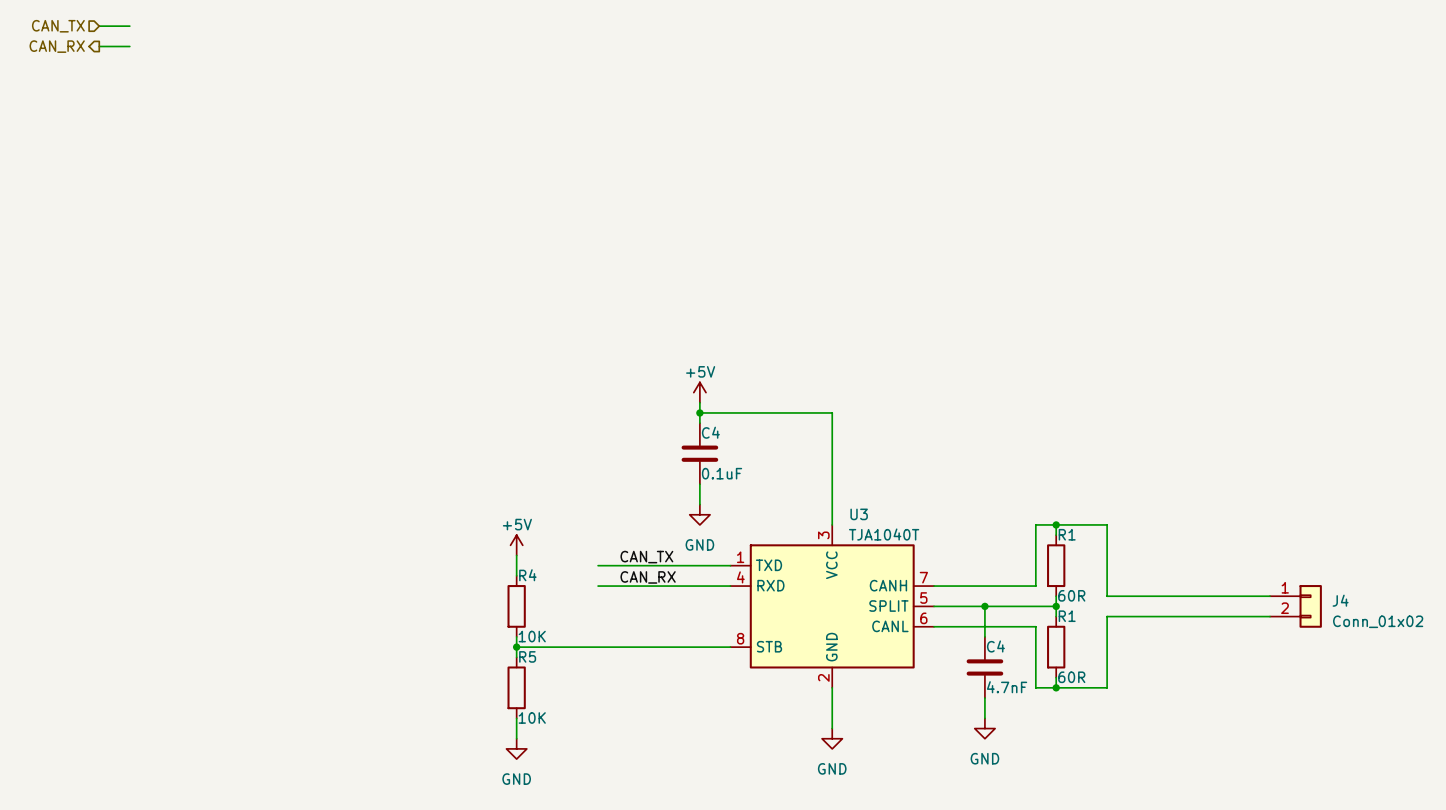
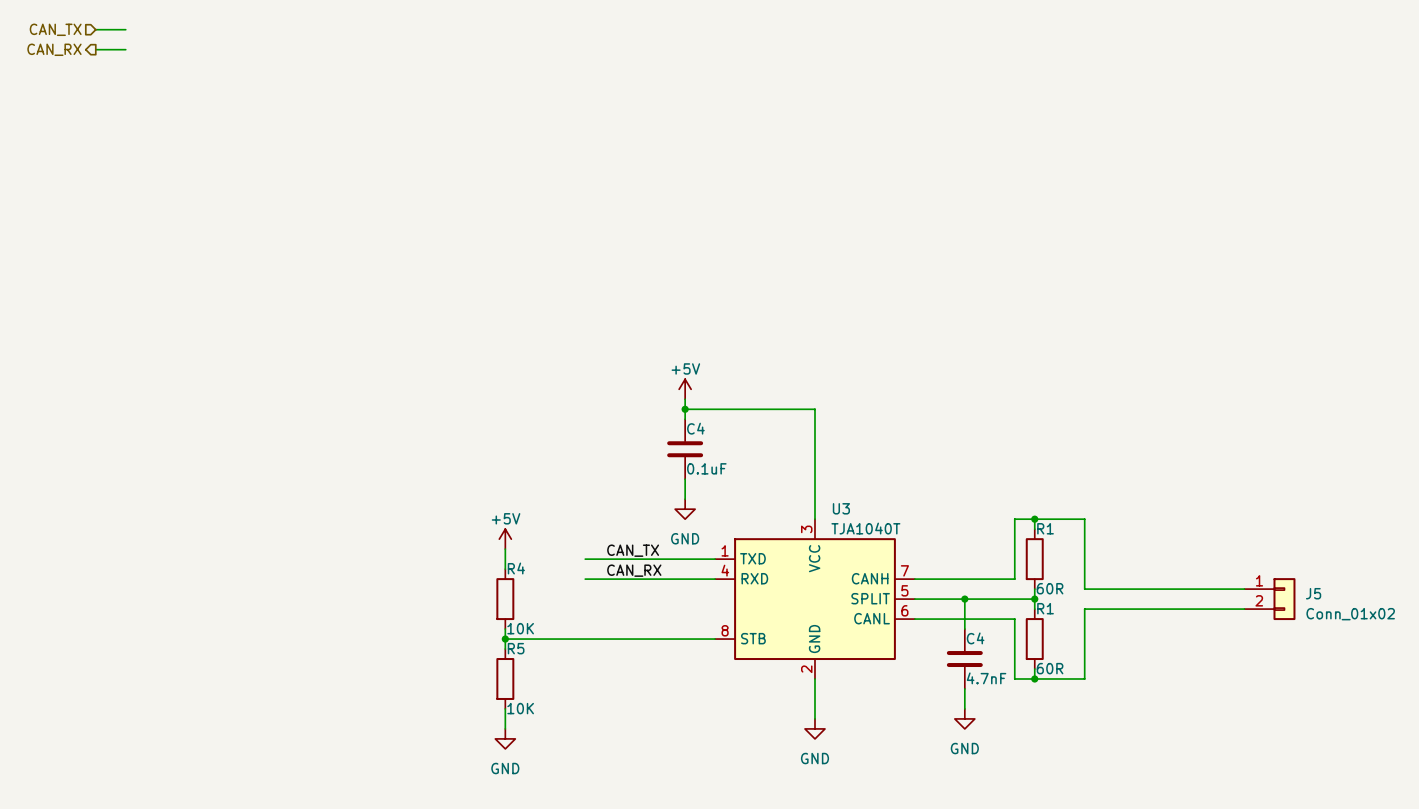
J4 name: J4 (1340, 600) -> J5 (1313, 593)

